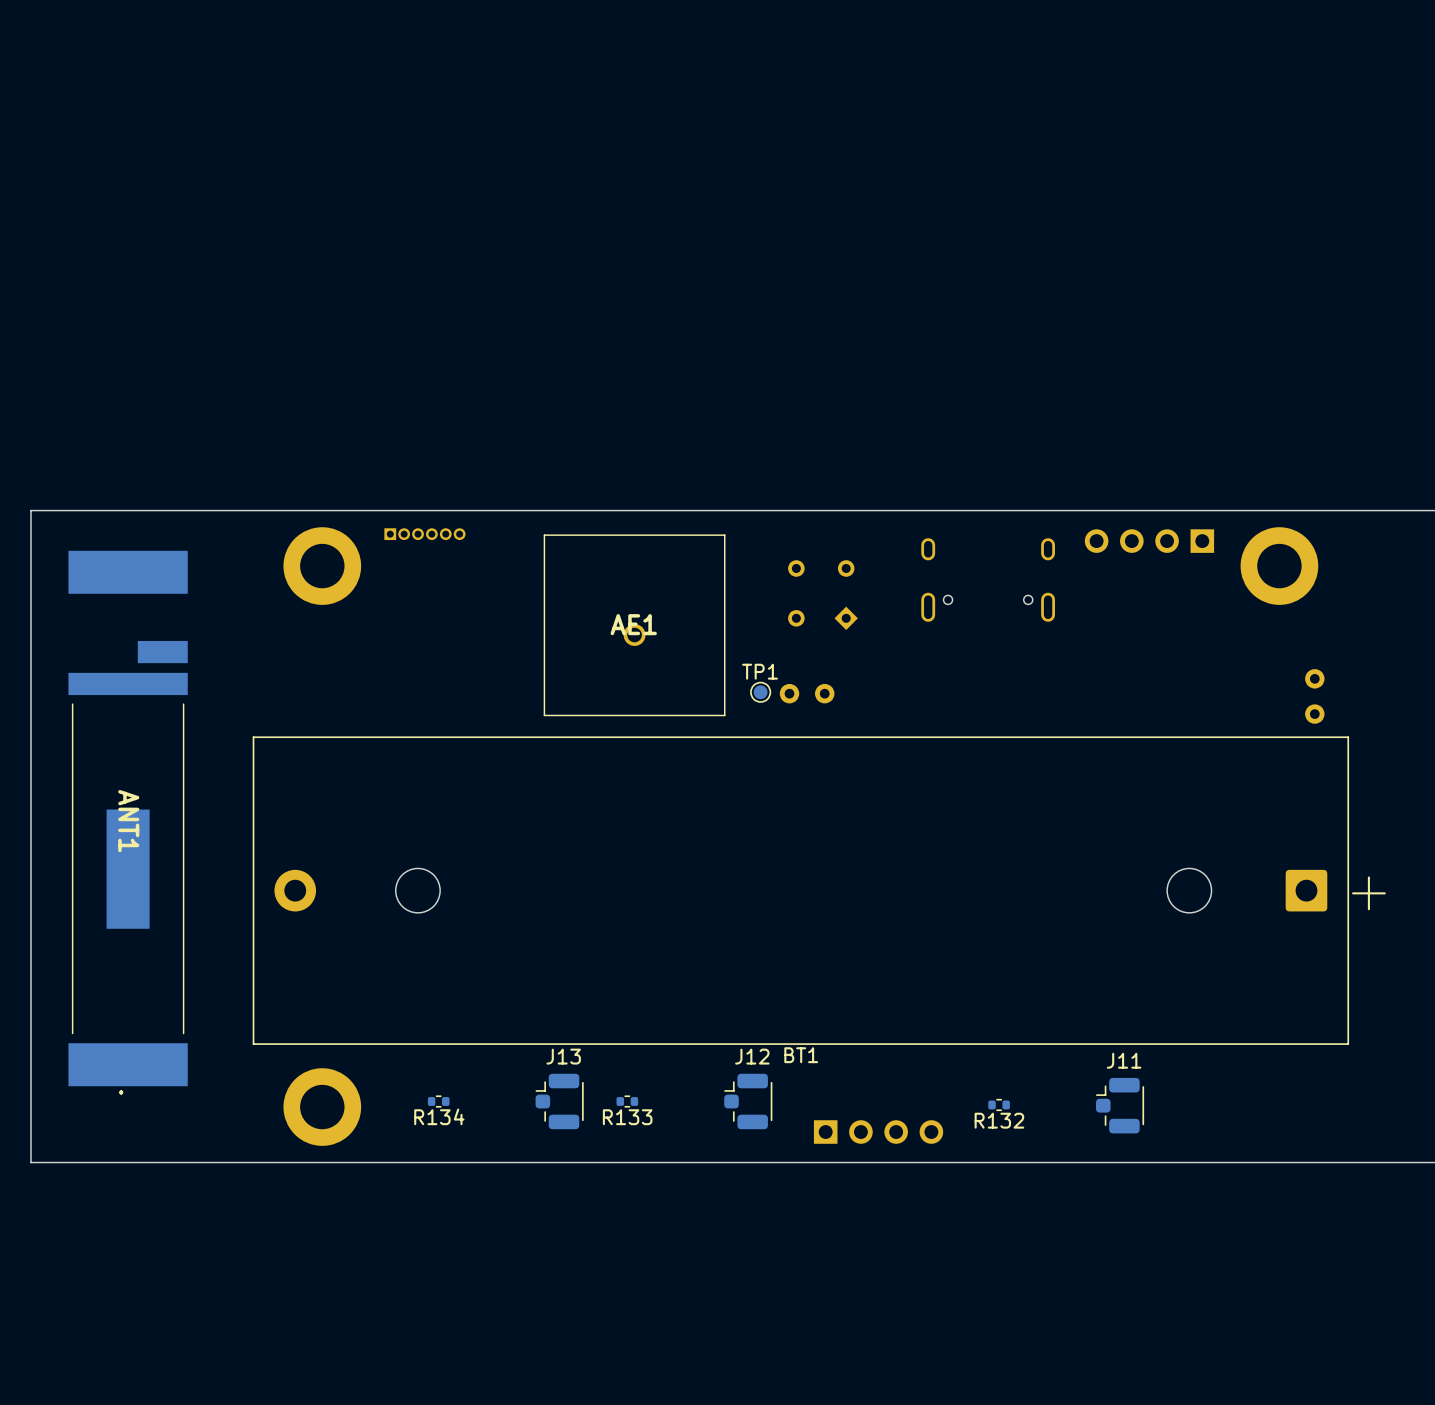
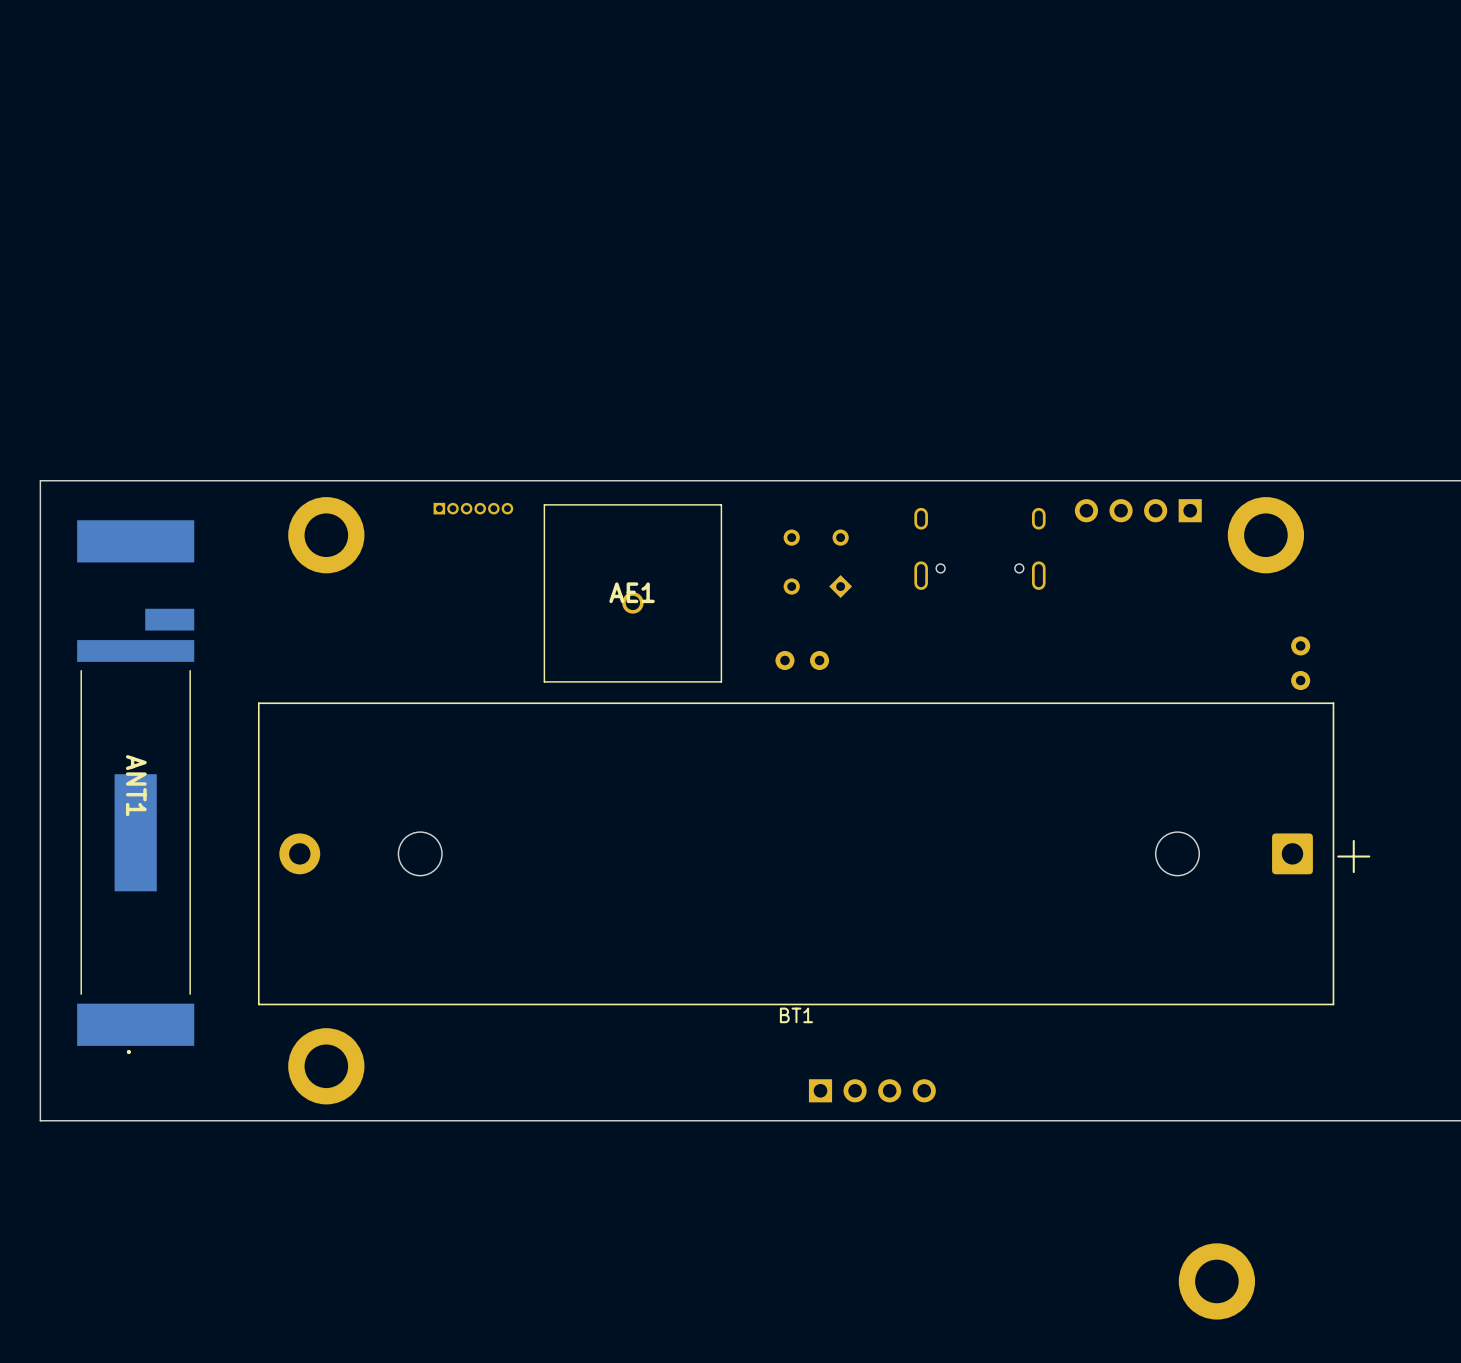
part position: (424, 534) -> (473, 508)
TP1: (760, 692) -> none
R134: (438, 1101) -> none
J13: (559, 1101) -> none
R133: (627, 1101) -> none
J12: (748, 1101) -> none
R132: (999, 1104) -> none
J11: (1120, 1105) -> none
part: none -> (1216, 1281)

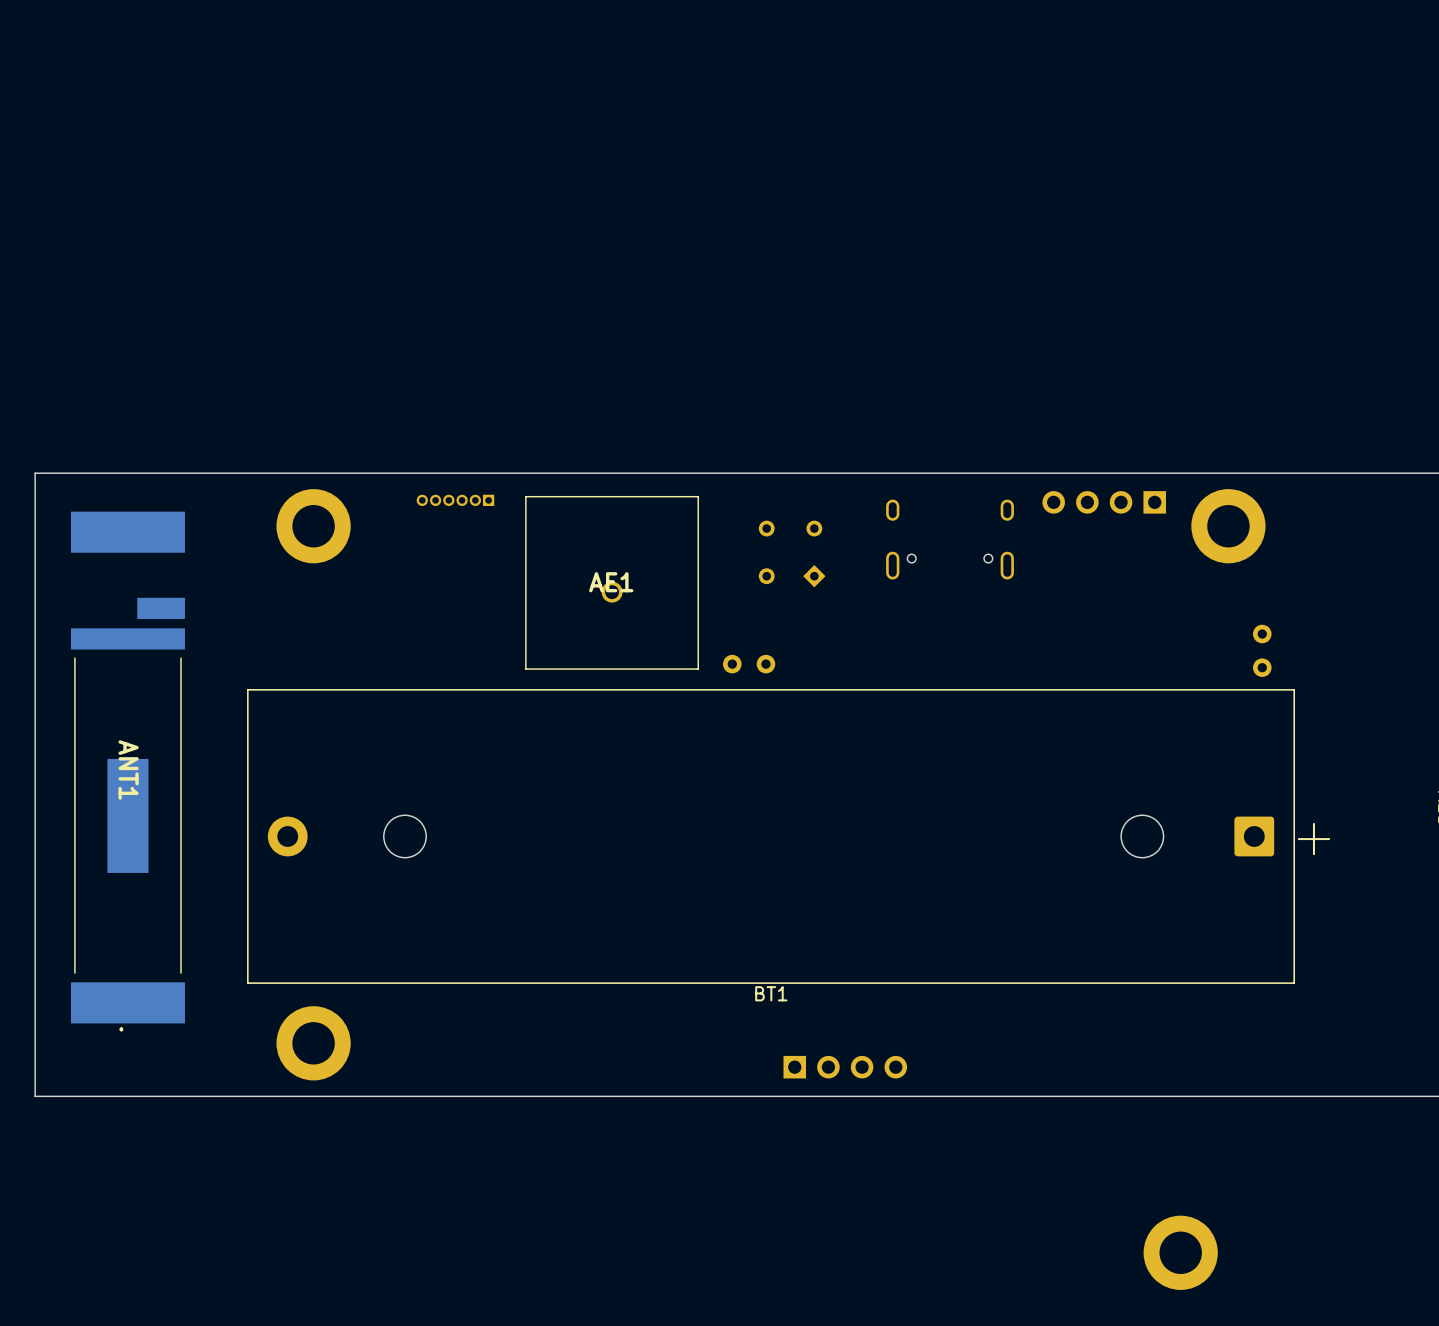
part rotation: 0° (473, 508) -> 180° (455, 500)
part position: (802, 660) -> (749, 664)

